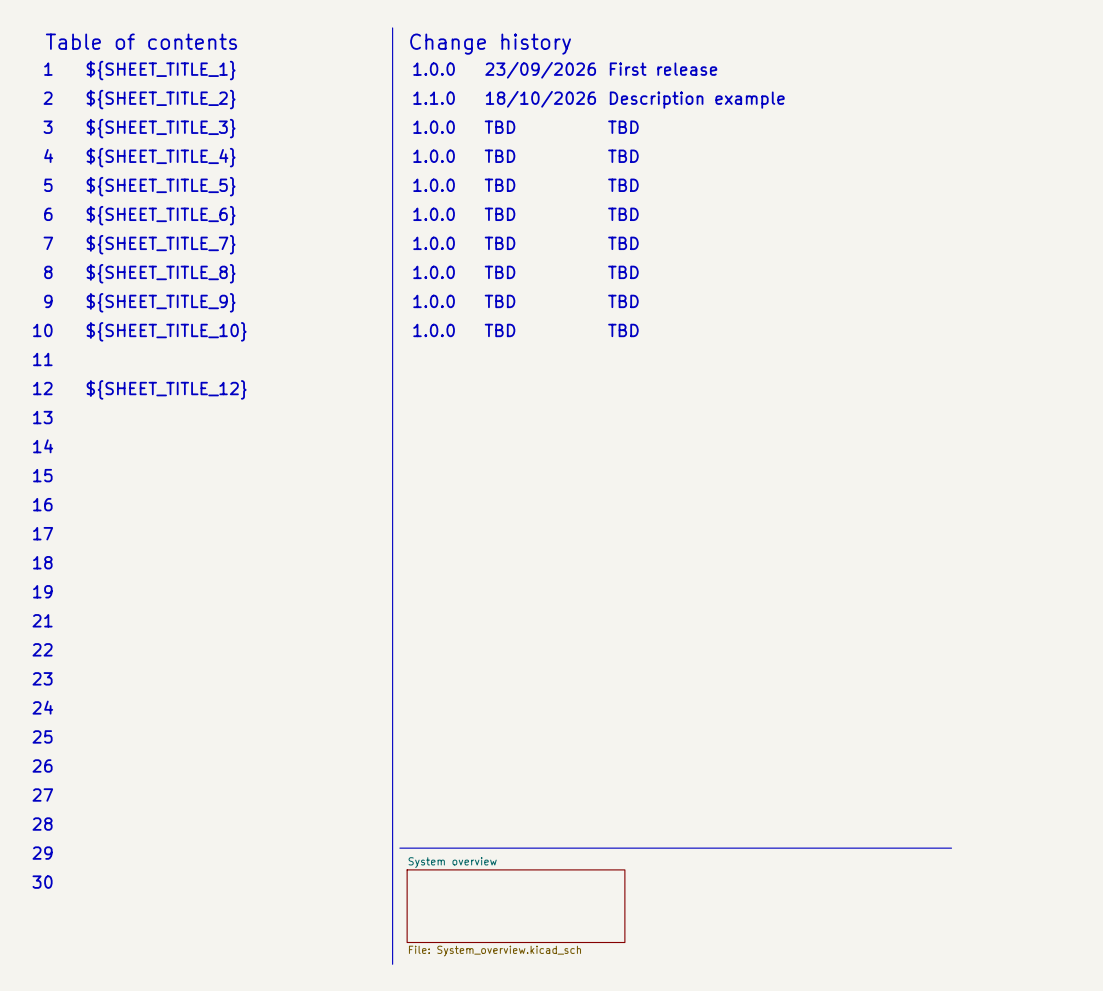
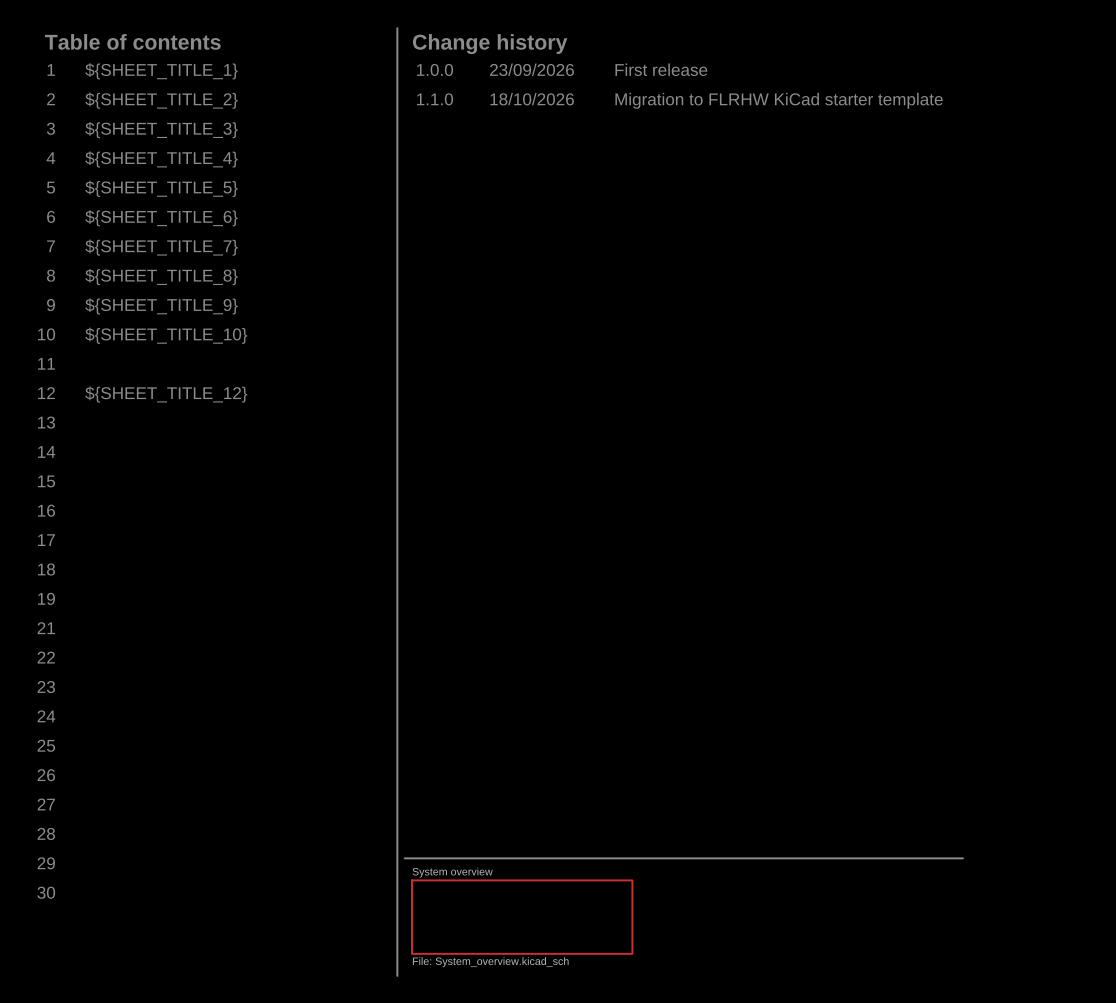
text: Description example (697, 100) -> Migration to FLRHW KiCad starter template (779, 100)
text: 1.0.0 (434, 127) -> none
text: TBD (500, 127) -> none
text: TBD (623, 127) -> none
text: 1.0.0 (434, 156) -> none
text: TBD (500, 156) -> none
text: TBD (623, 156) -> none
text: 1.0.0 (434, 185) -> none
text: TBD (500, 185) -> none
text: TBD (623, 185) -> none
text: 1.0.0 (434, 214) -> none
text: TBD (500, 214) -> none
text: TBD (623, 214) -> none
text: 1.0.0 (434, 243) -> none
text: TBD (500, 243) -> none
text: TBD (623, 243) -> none
text: 1.0.0 (434, 272) -> none
text: TBD (500, 272) -> none
text: TBD (623, 272) -> none
text: 1.0.0 (434, 301) -> none
text: TBD (500, 301) -> none
text: TBD (623, 301) -> none
text: 1.0.0 (434, 330) -> none
text: TBD (500, 330) -> none
text: TBD (623, 330) -> none

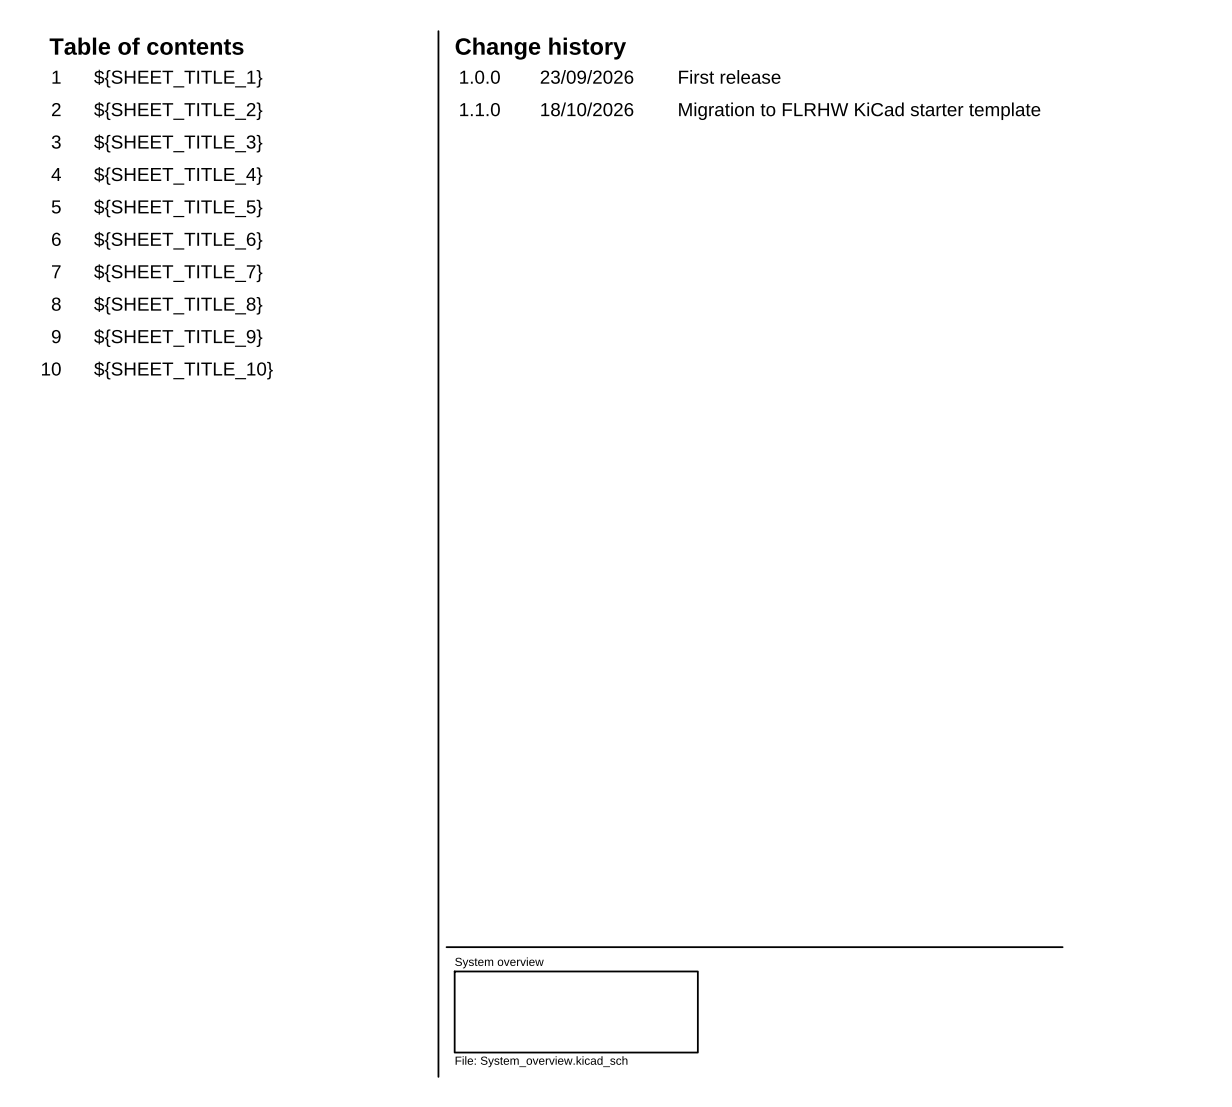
text: 11 (46, 363) -> none
text: 12 (46, 393) -> none
text: ${SHEET_TITLE_12} (166, 394) -> none
text: 13 (46, 422) -> none
text: 14 (46, 451) -> none
text: 15 (46, 481) -> none
text: 16 (46, 510) -> none
text: 17 (46, 540) -> none
text: 18 (46, 569) -> none
text: 19 (46, 598) -> none
text: 21 (46, 628) -> none
text: 22 (46, 657) -> none
text: 23 (46, 687) -> none
text: 24 (46, 716) -> none
text: 25 (46, 745) -> none
text: 26 (46, 775) -> none
text: 27 (46, 804) -> none
text: 28 (46, 833) -> none
text: 29 (46, 863) -> none
text: 30 (46, 892) -> none

